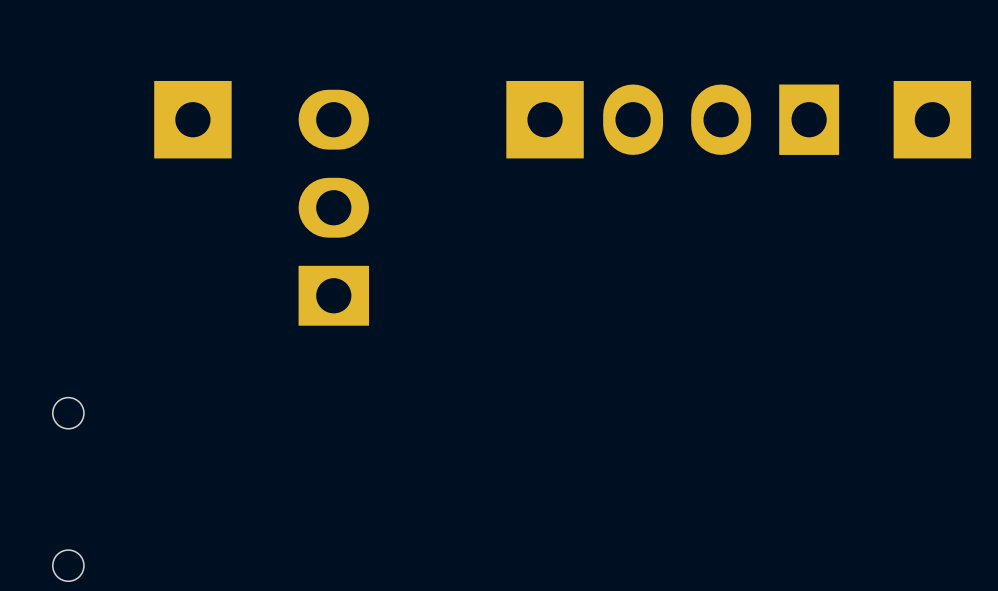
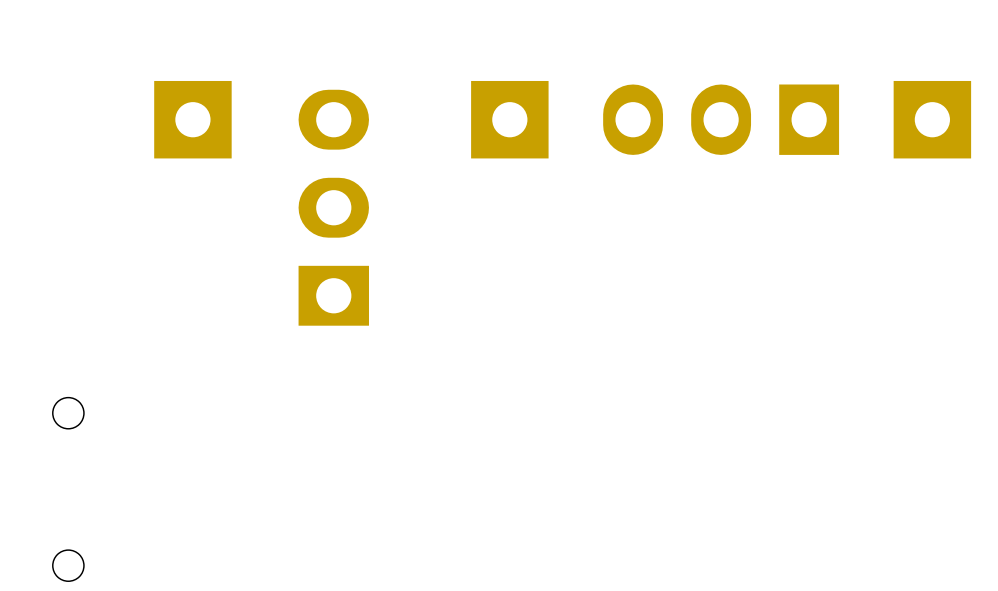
part position: (545, 119) -> (509, 119)

